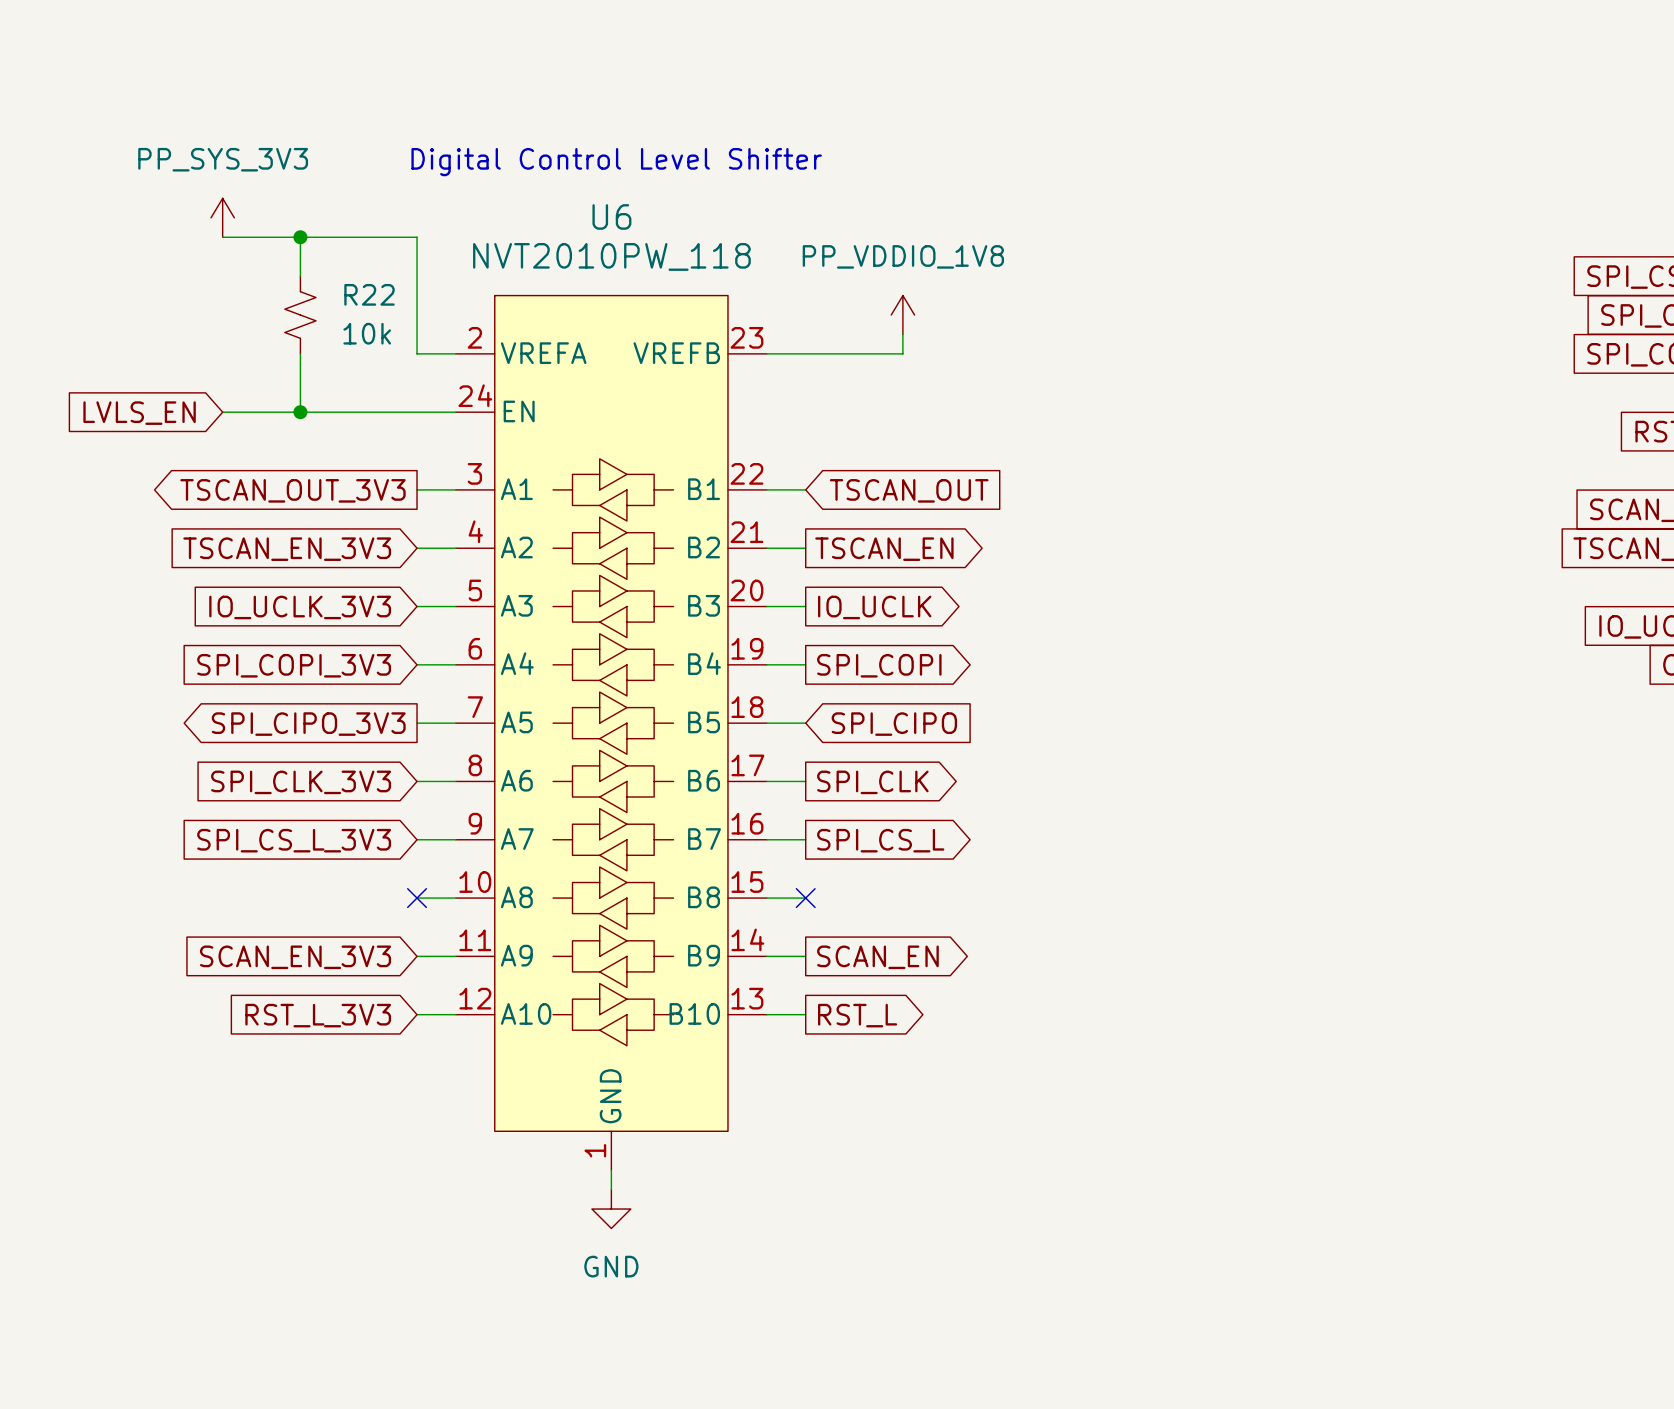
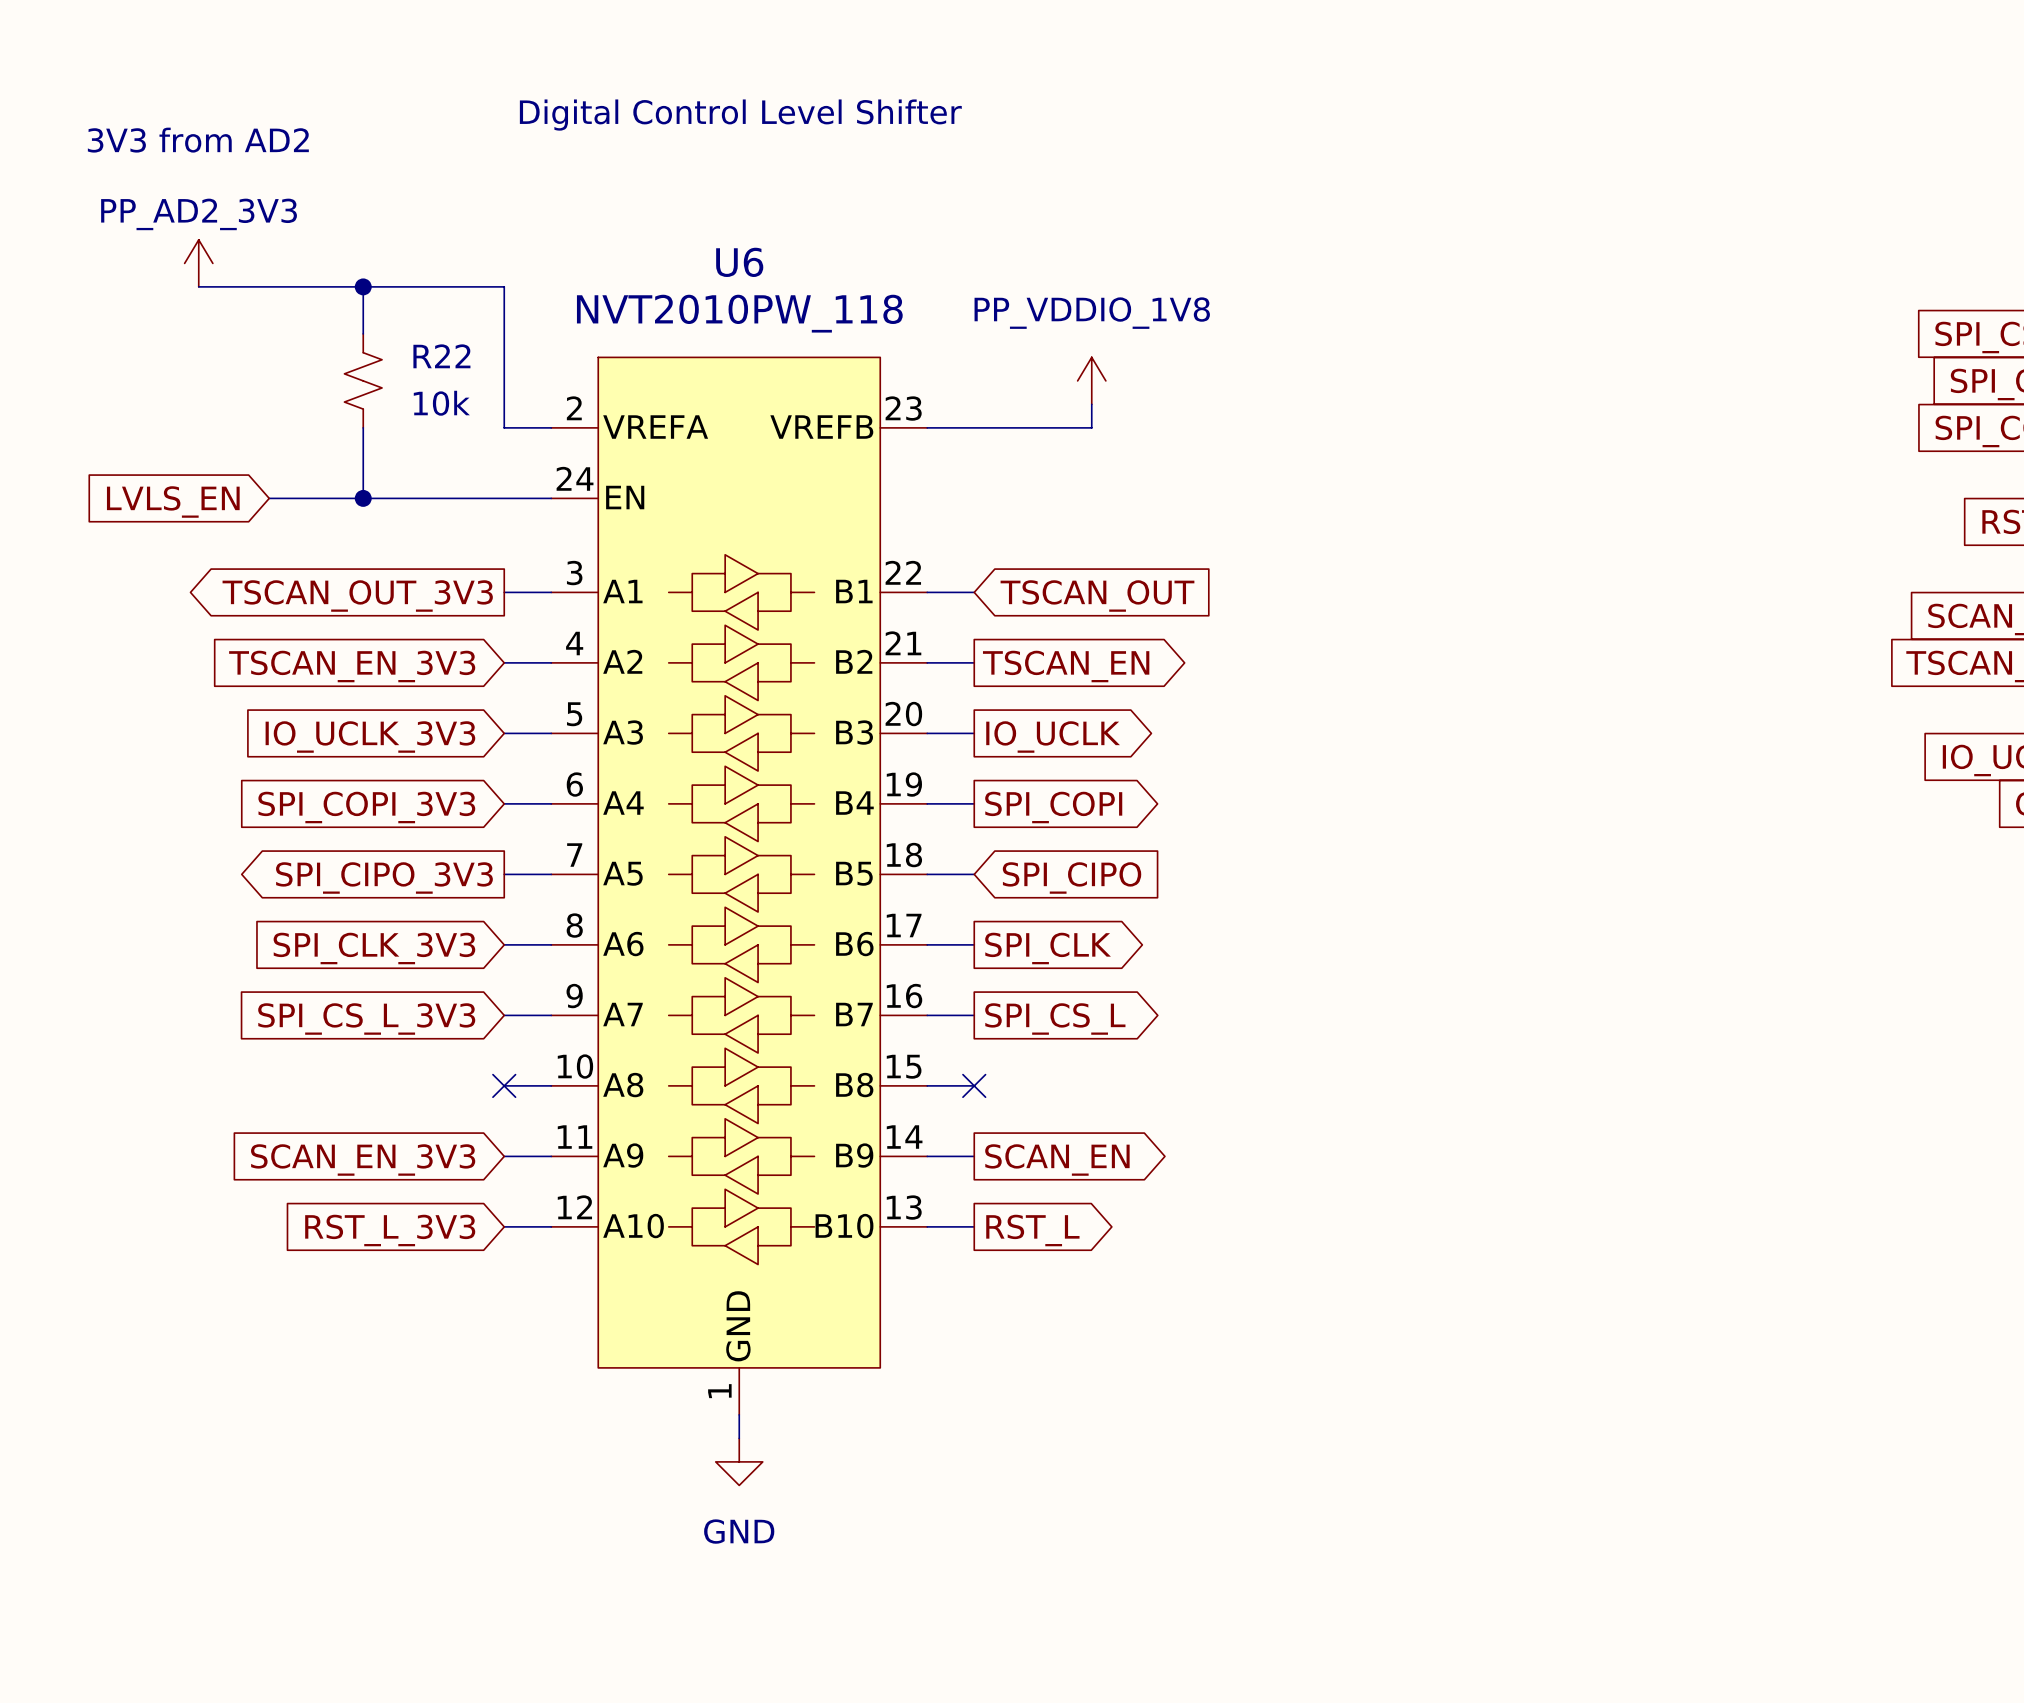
text: none -> 3V3 from AD2 (198, 140)
text position: Digital Control Level Shifter (616, 162) -> Digital Control Level Shifter (740, 115)
power symbol: none -> PP_AD2_3V3 (198, 263)
power symbol: PP_SYS_3V3 (222, 217) -> none
wire: none -> (198, 286) (269, 286)

